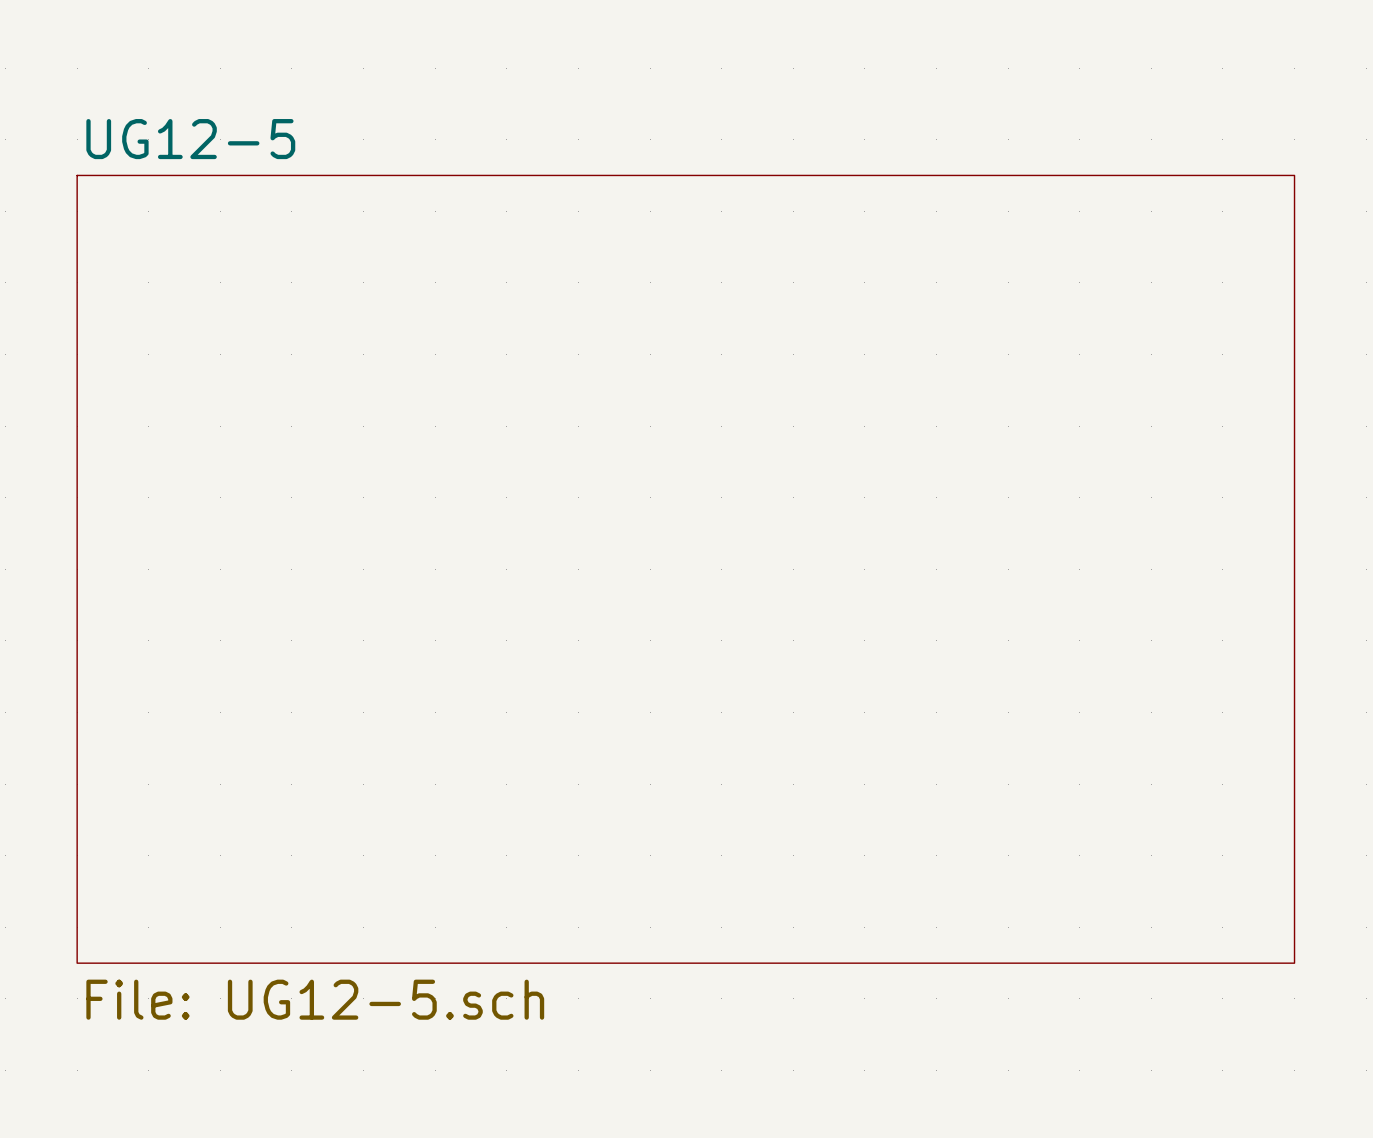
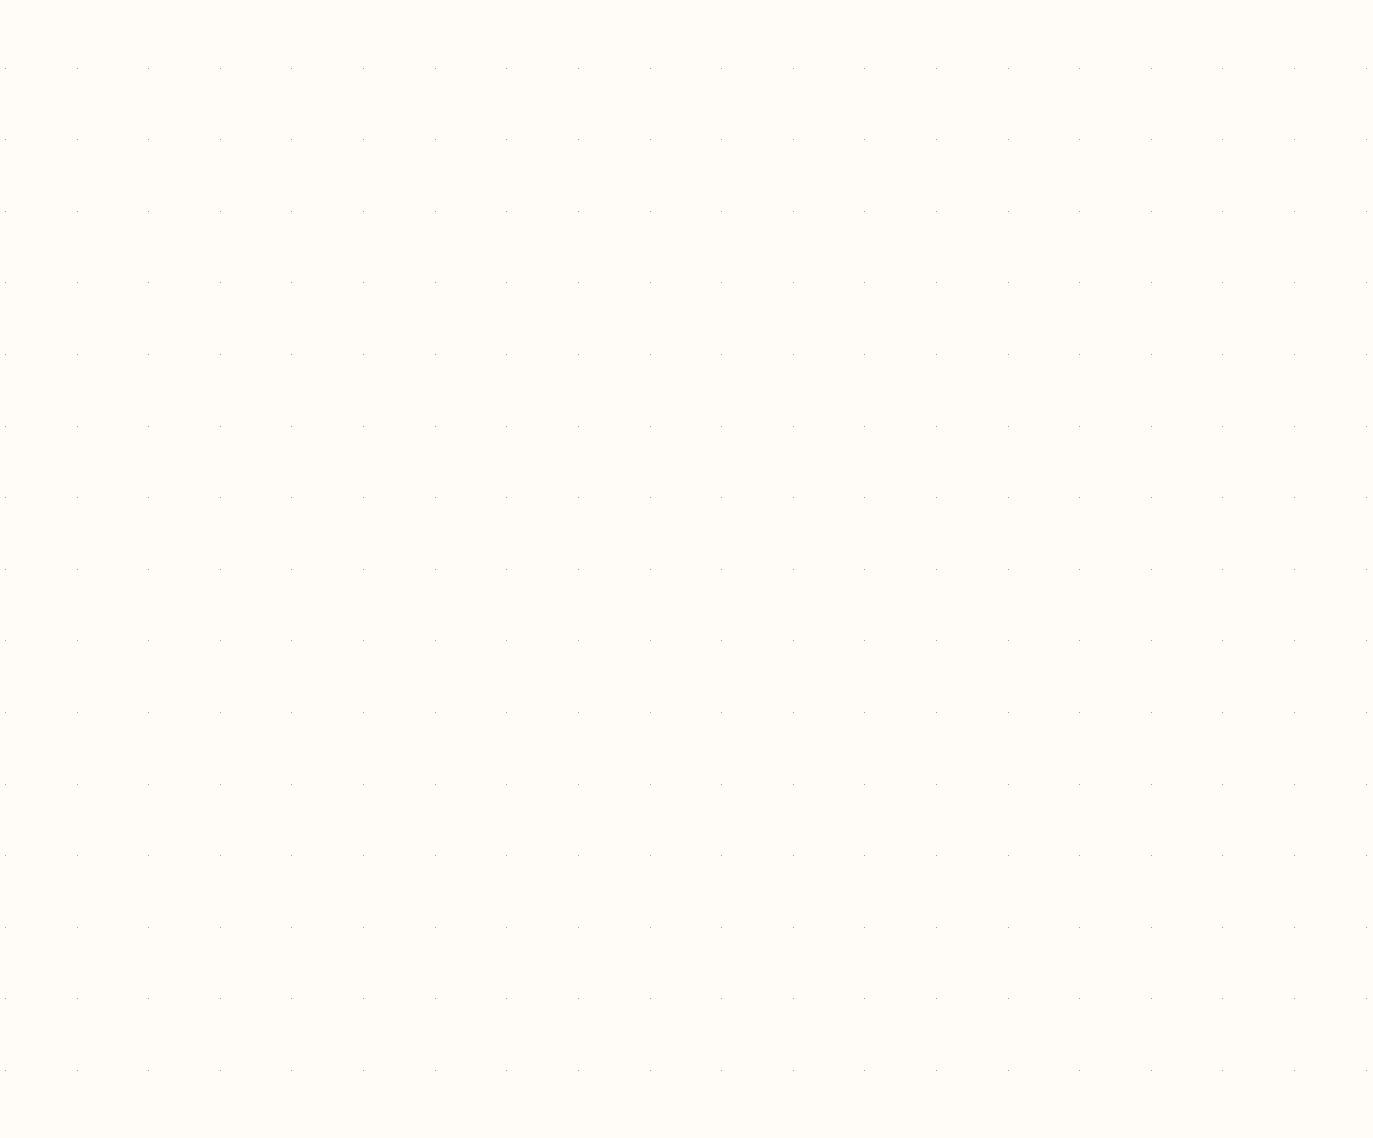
sheet UG12-5: File: UG12-5.sch (685, 569) -> none

